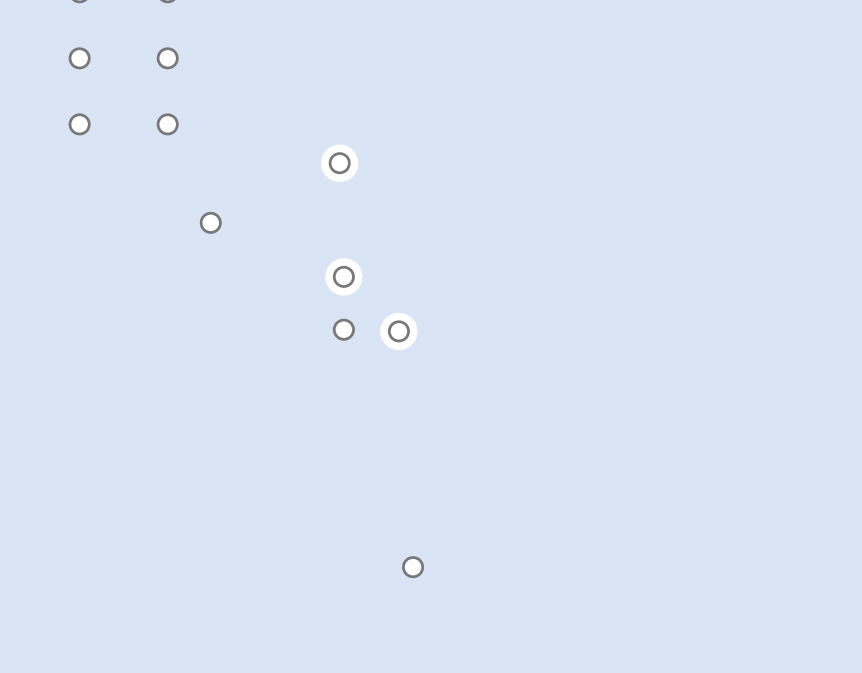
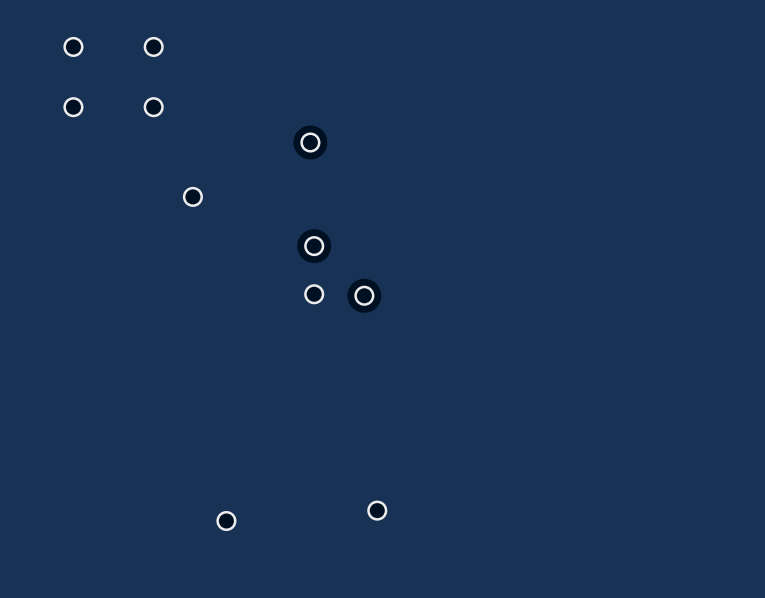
via: none -> (226, 521)

